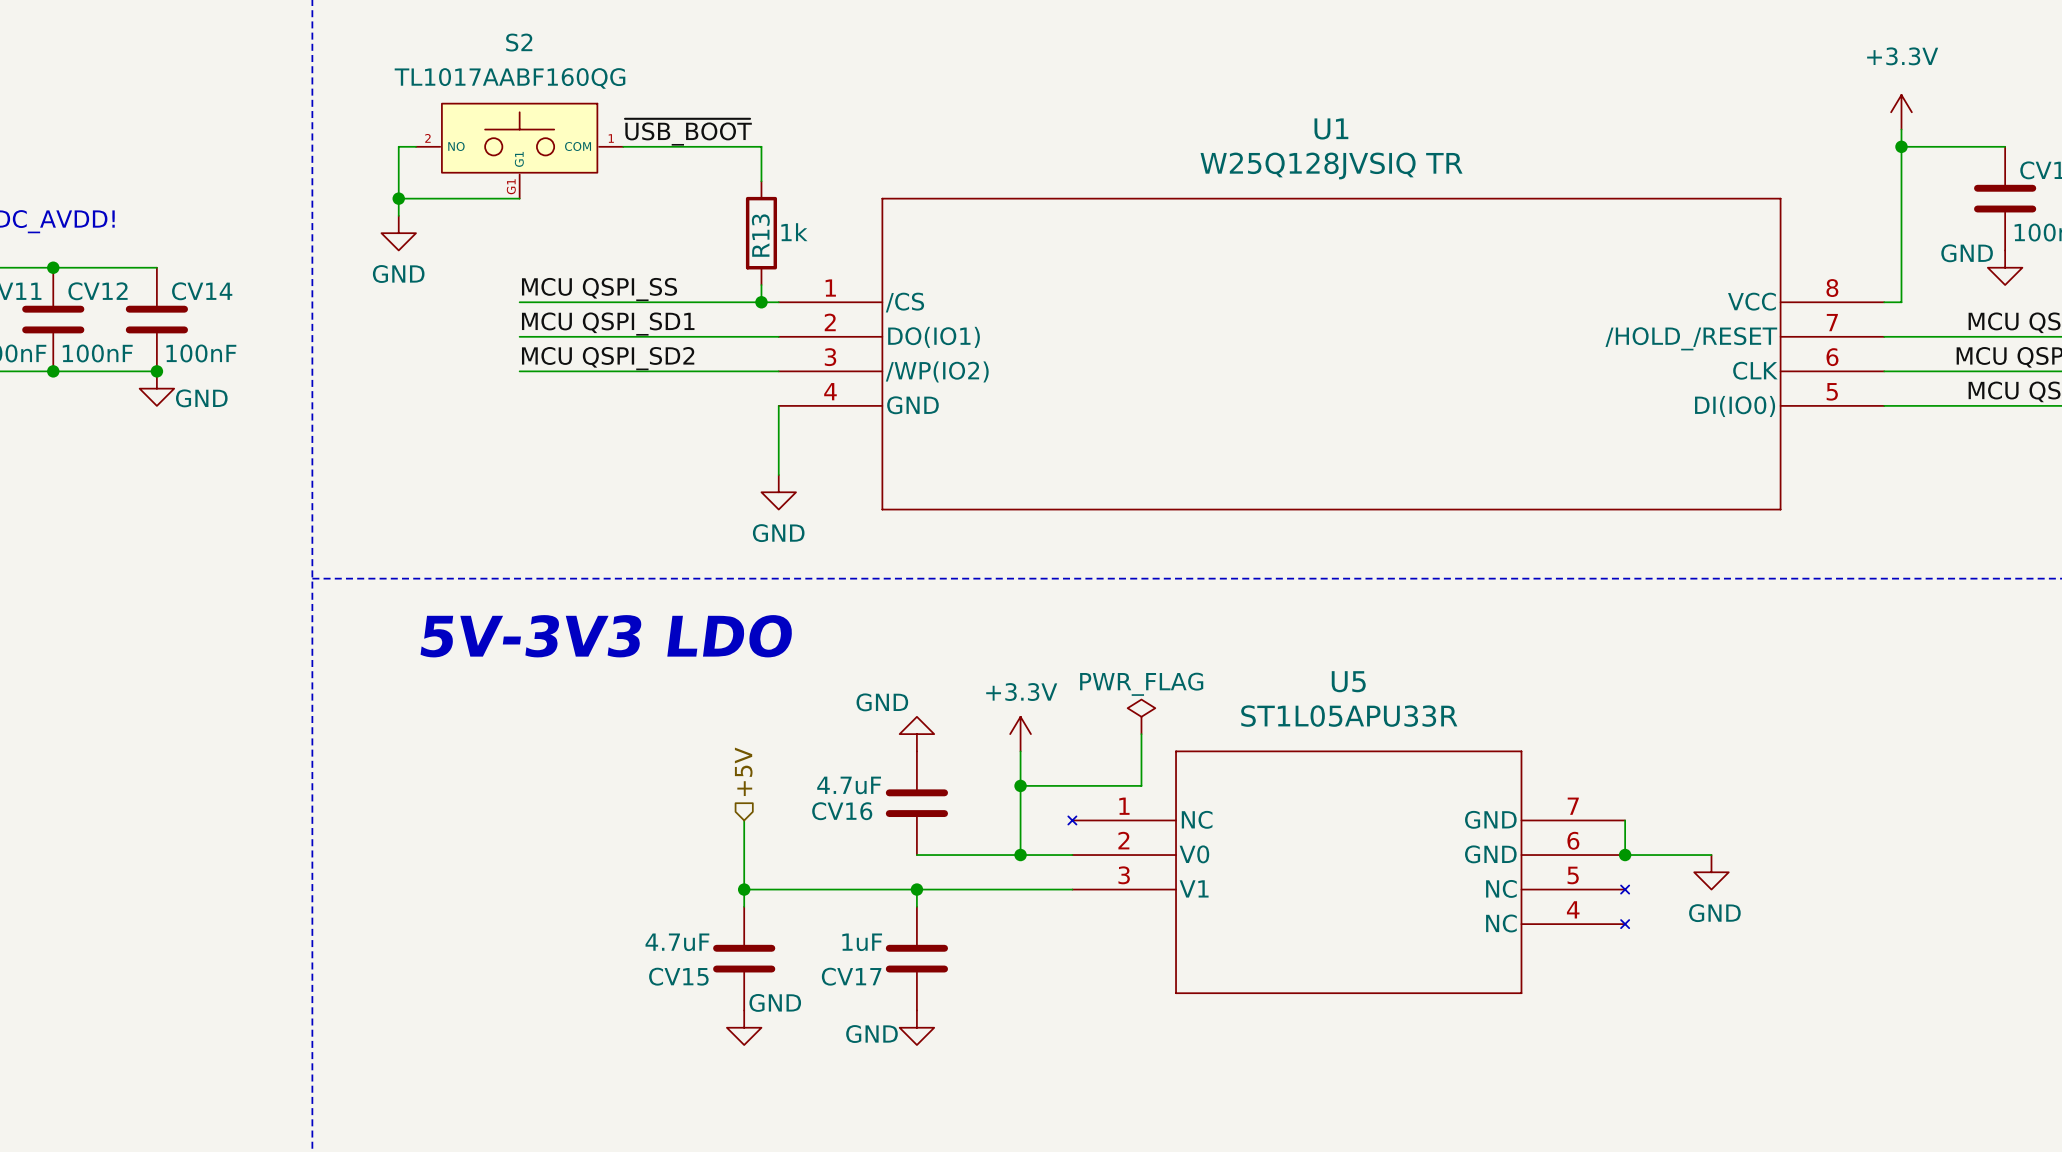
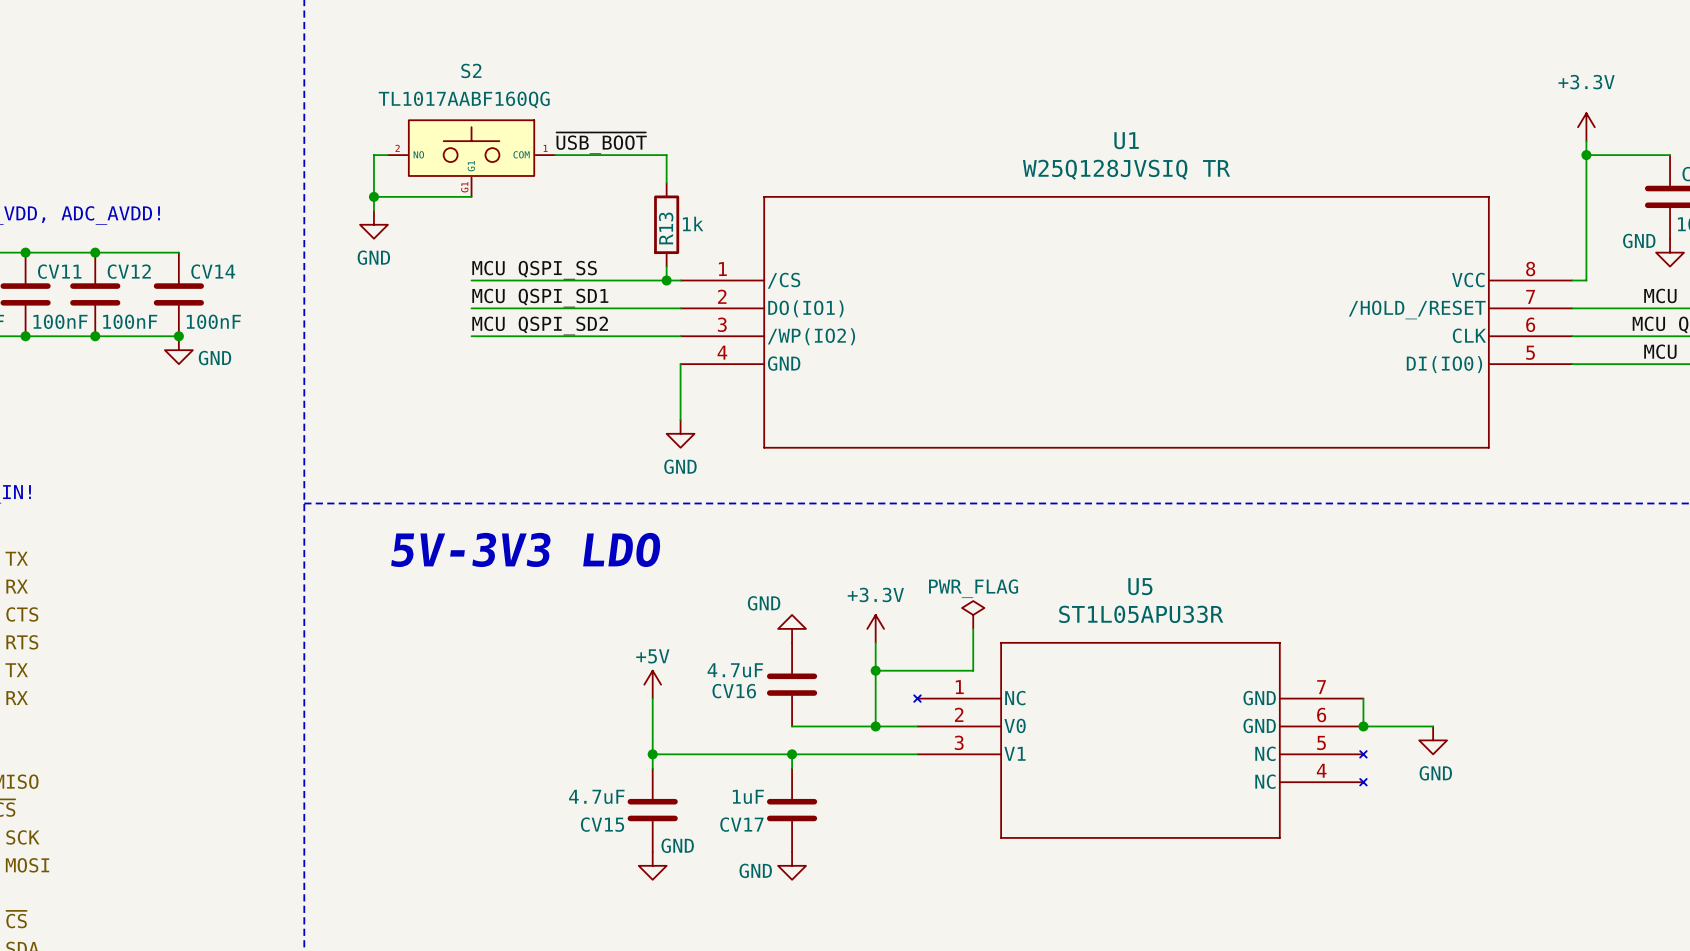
hierarchical label: +5V (743, 771) -> none
power symbol: none -> +5V (652, 684)

